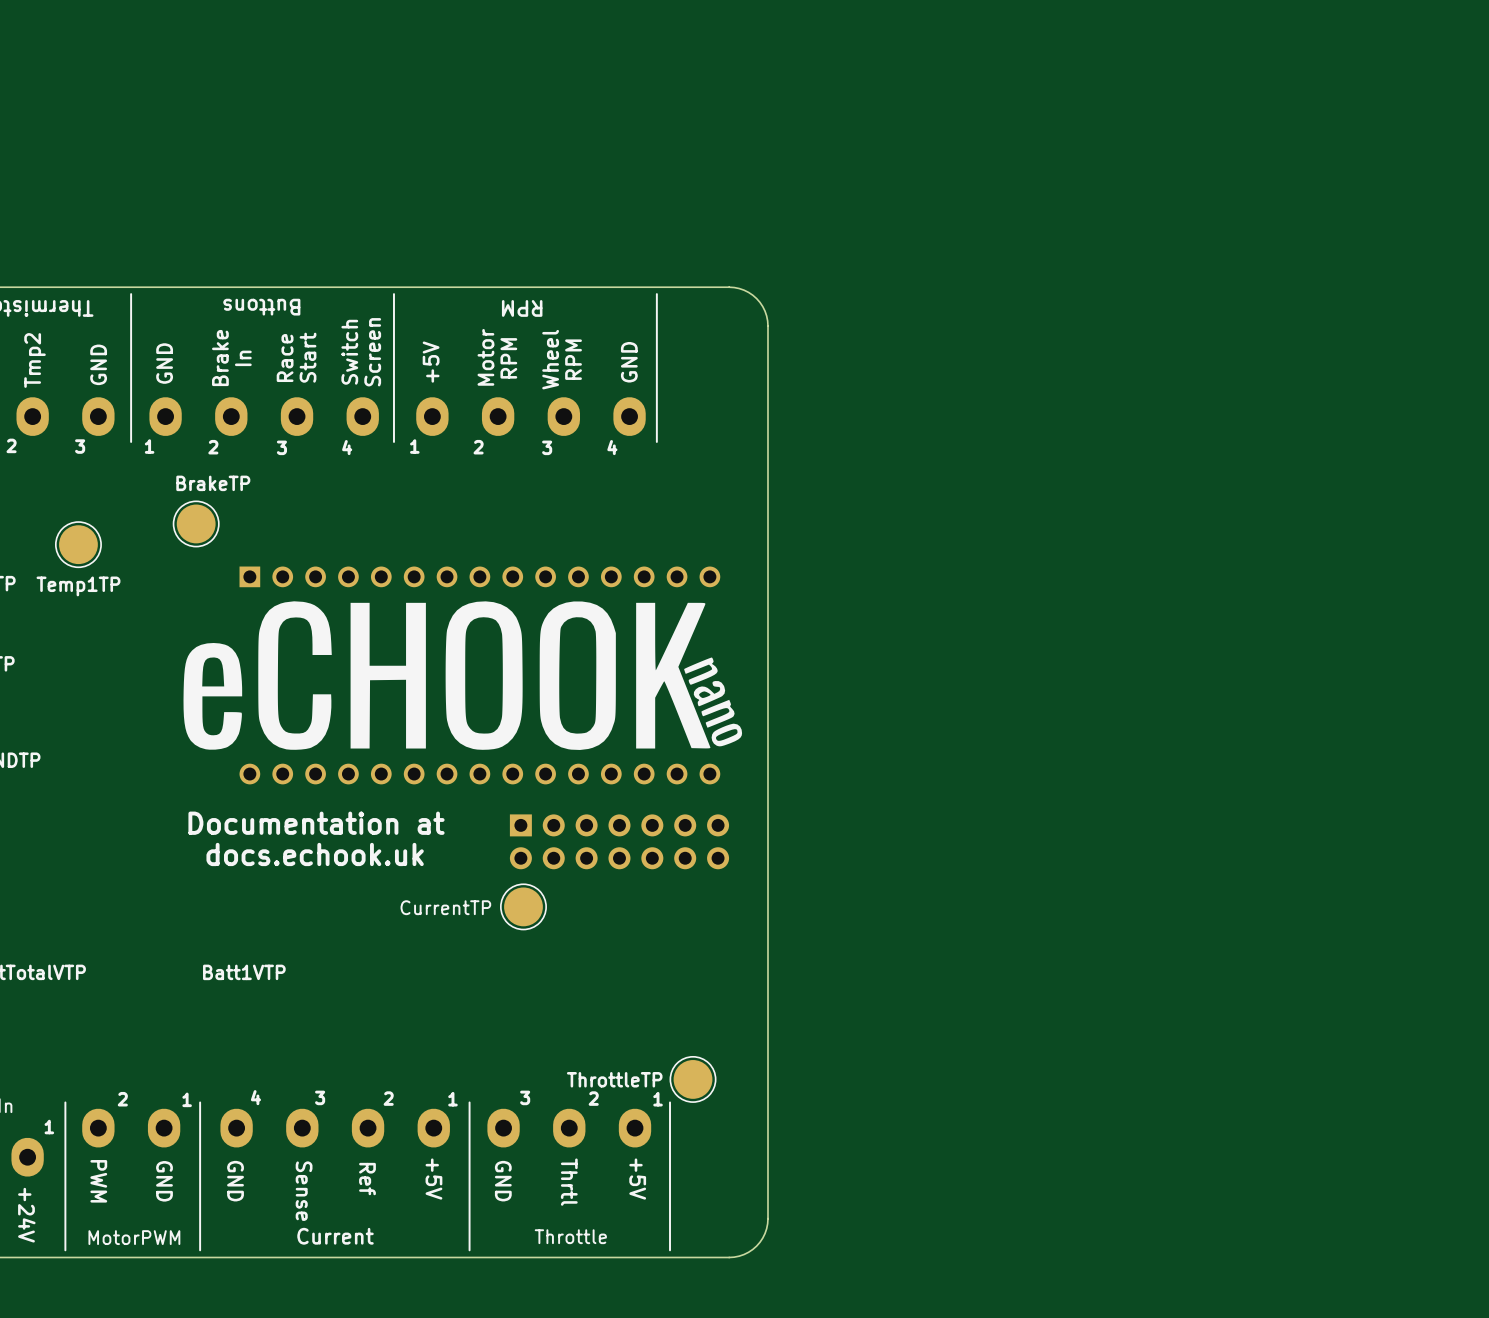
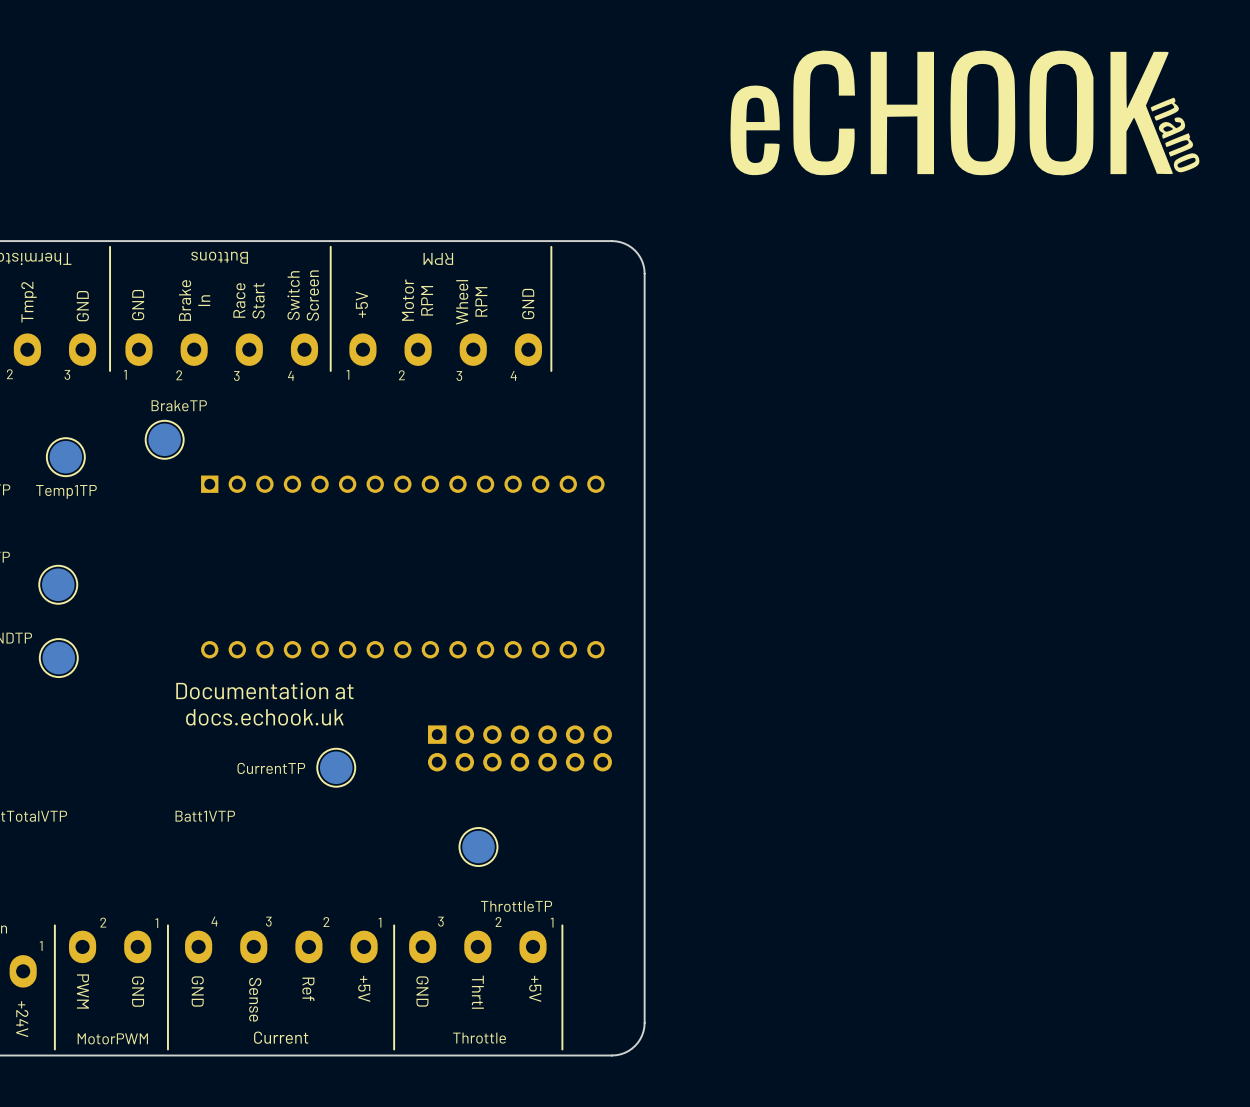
drawing: none -> [730, 50, 1200, 176]
drawing: [183, 601, 743, 750] -> none
part: none -> (58, 584)
part: none -> (58, 658)
part position: (619, 841) -> (519, 748)
part position: (523, 906) -> (336, 767)
part position: (693, 1079) -> (478, 847)

